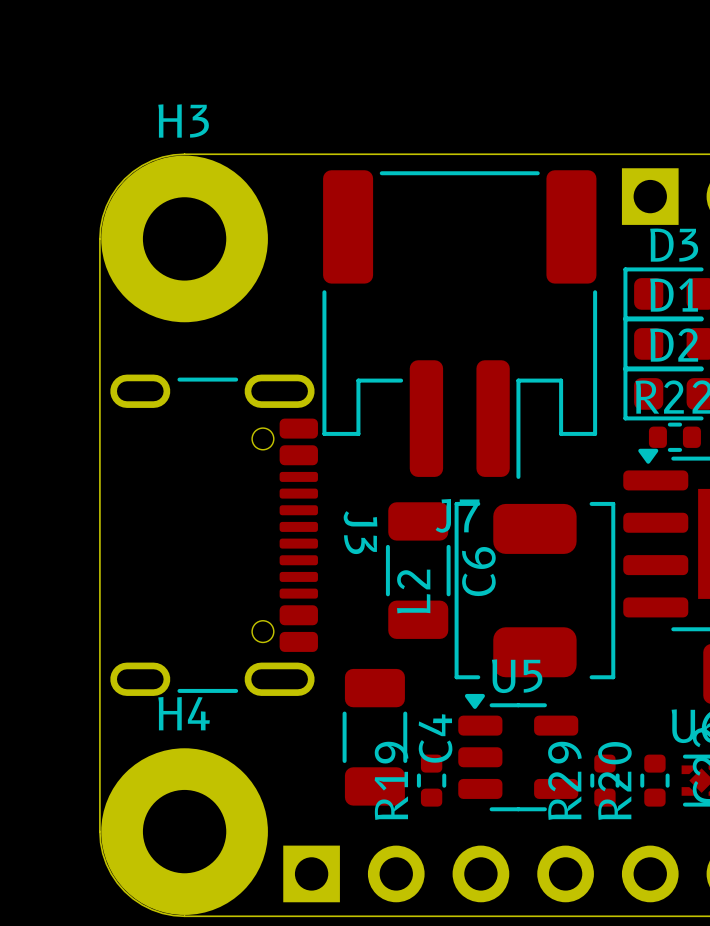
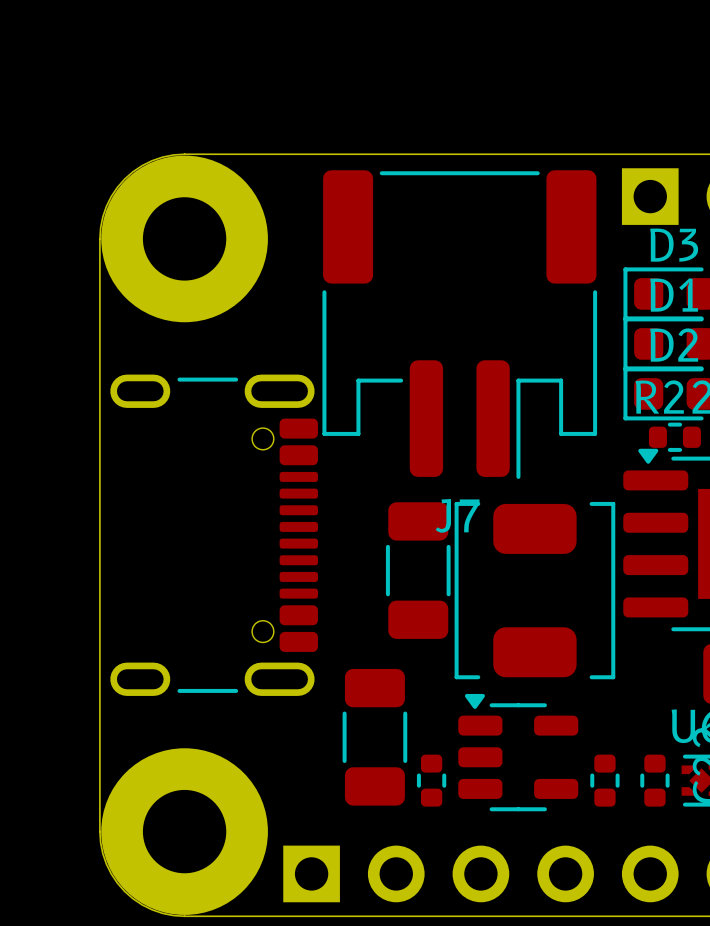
H3 name: H3 (183, 121) -> none
J3 name: J3 (360, 532) -> none
C6 name: C6 (478, 571) -> none
L2 name: L2 (413, 591) -> none
U5 name: U5 (517, 676) -> none
H4 name: H4 (184, 713) -> none
C4 name: C4 (435, 738) -> none
R19 name: R19 (391, 780) -> none
R29 name: R29 (564, 780) -> none
R20 name: R20 (614, 780) -> none

